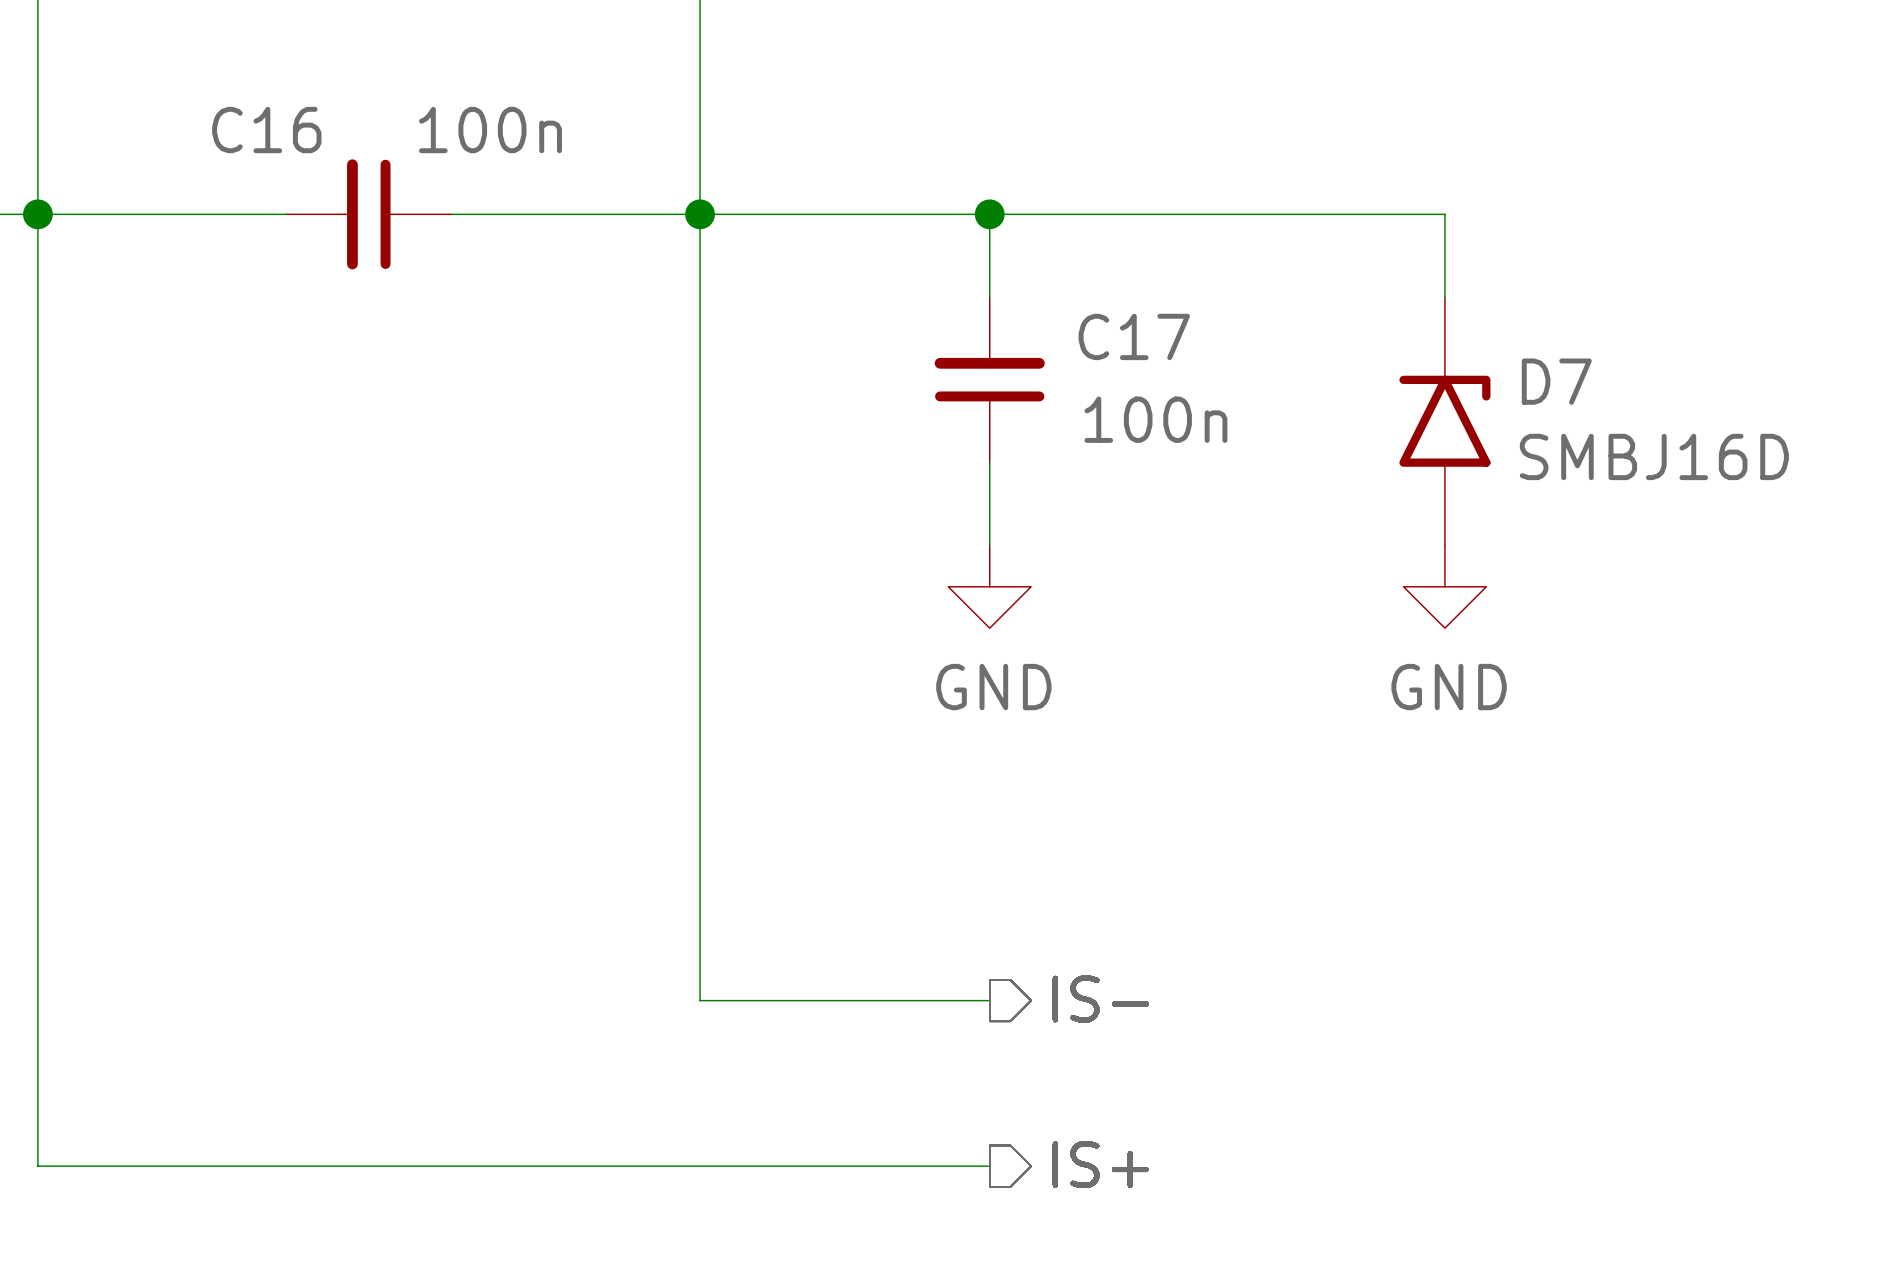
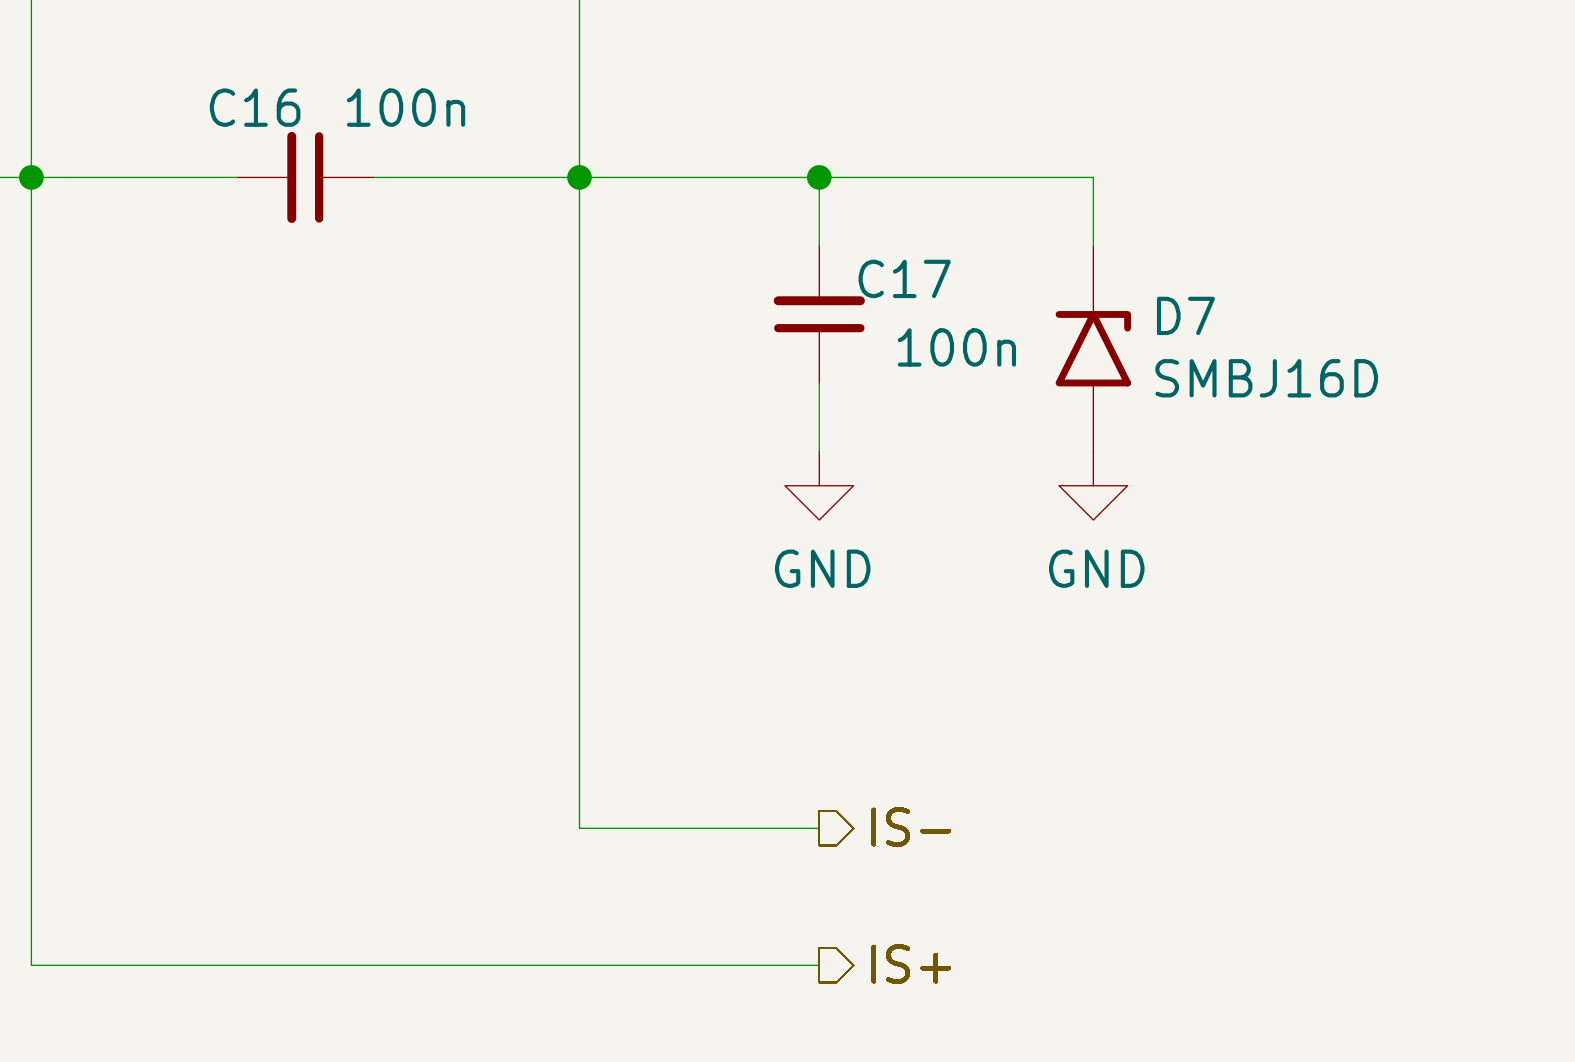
C16 name position: C16 (266, 130) -> C16 (255, 107)
wire: (1320, 214) (1444, 214) (1444, 297) -> (1093, 177) (1093, 245)
C17 name position: C17 (1134, 336) -> C17 (904, 278)
D7 position: (1444, 421) -> (1093, 348)
power symbol position: GND (1444, 586) -> GND (1093, 485)

